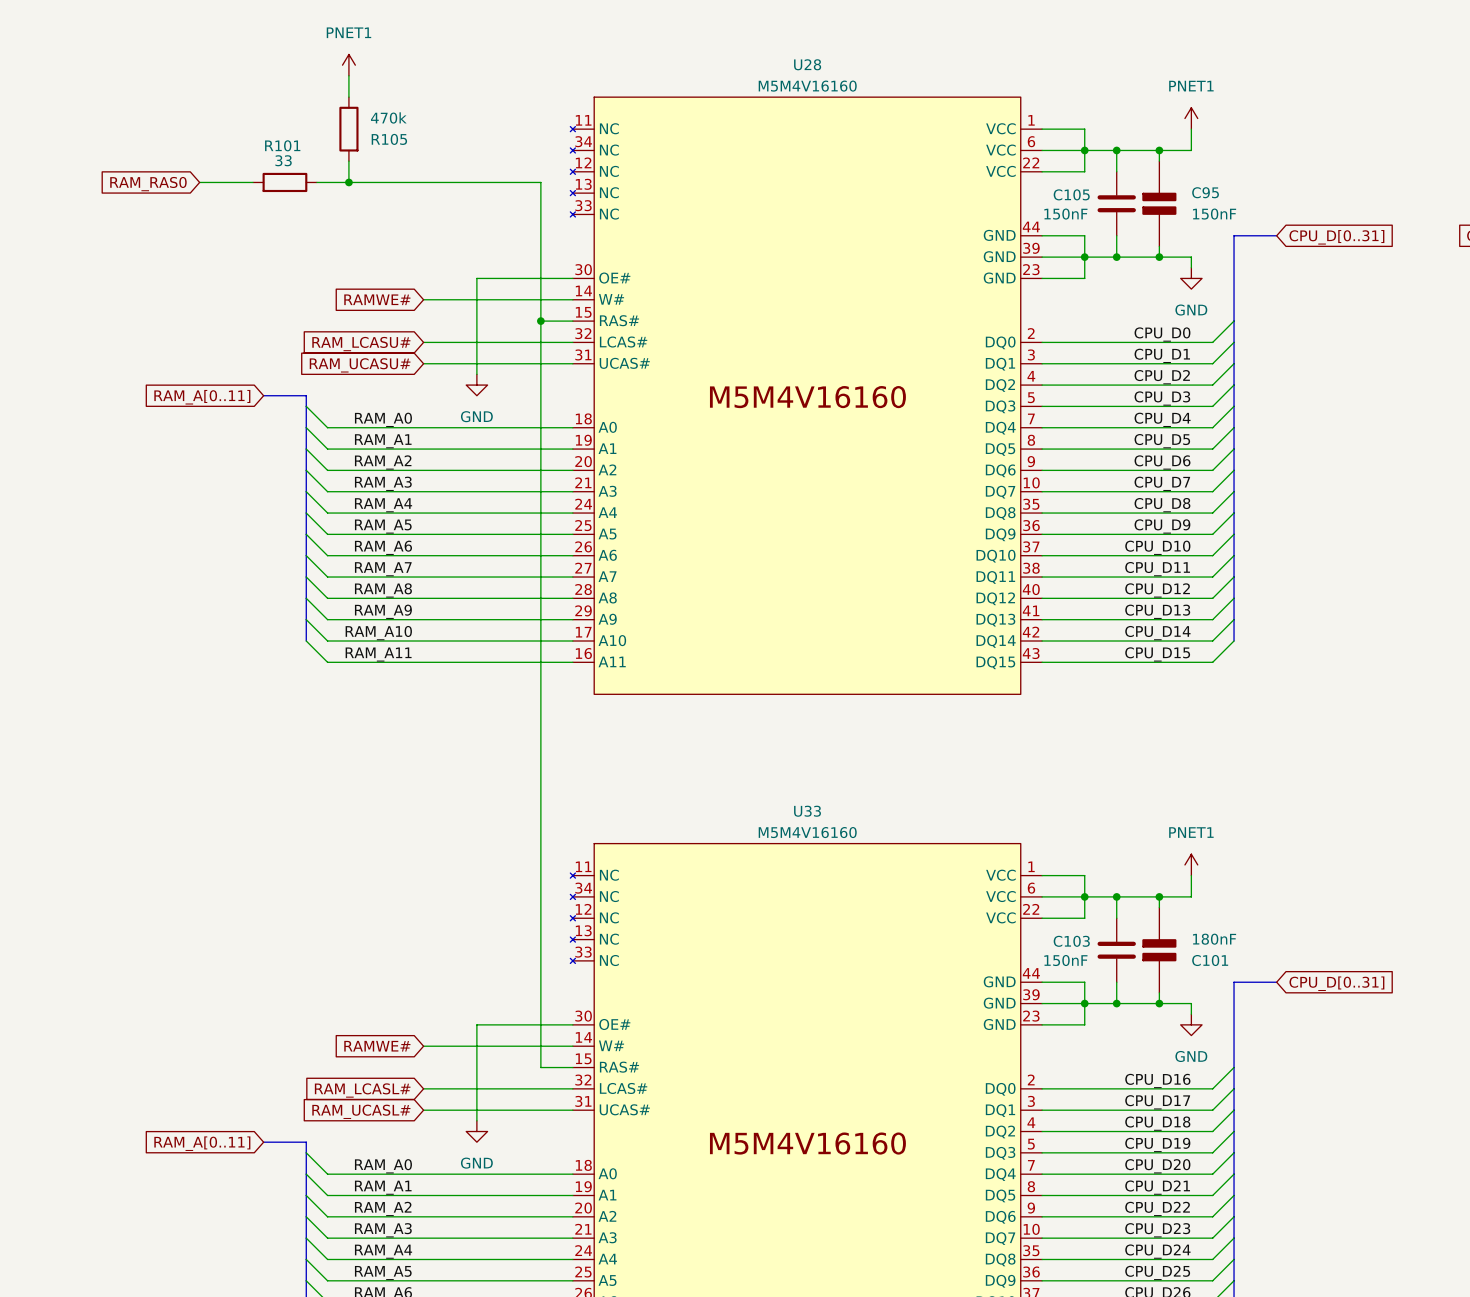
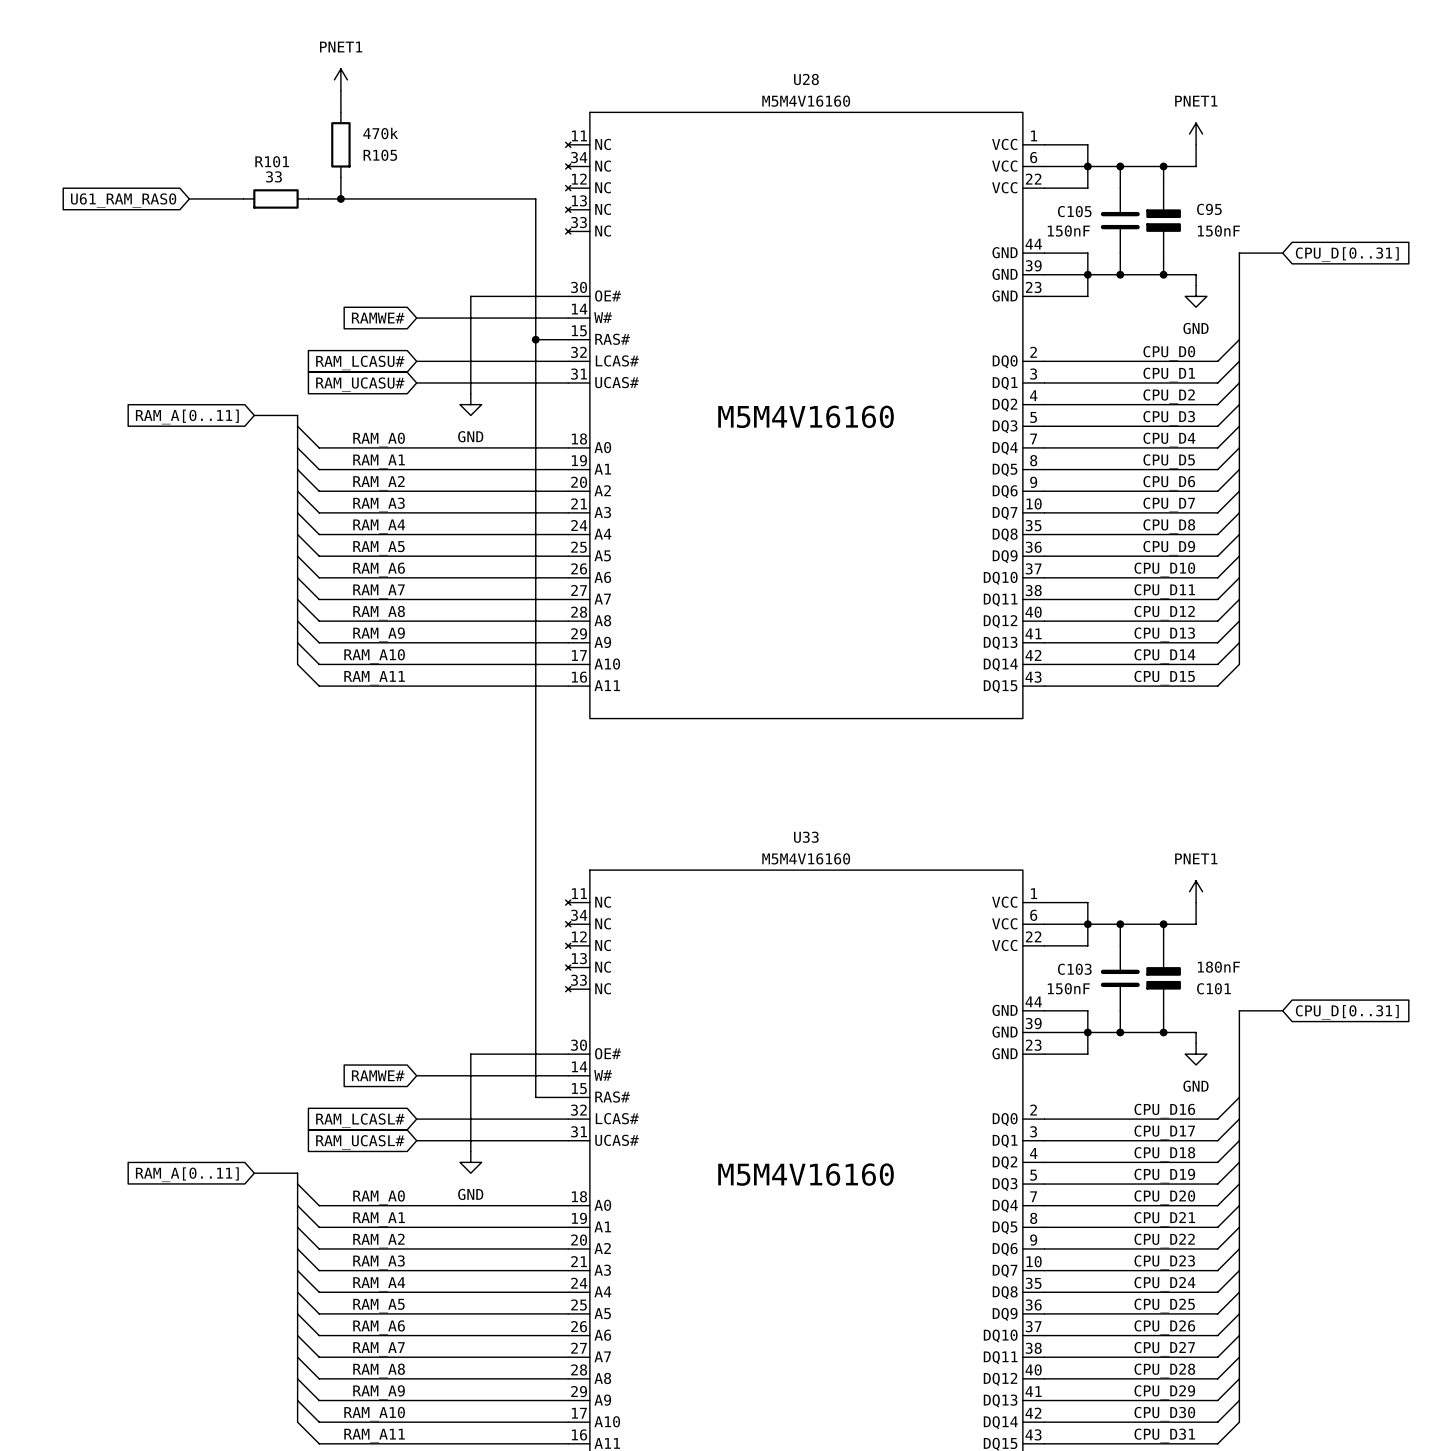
global label: RAM_RAS0 (148, 184) -> U61_RAM_RAS0 (123, 200)

